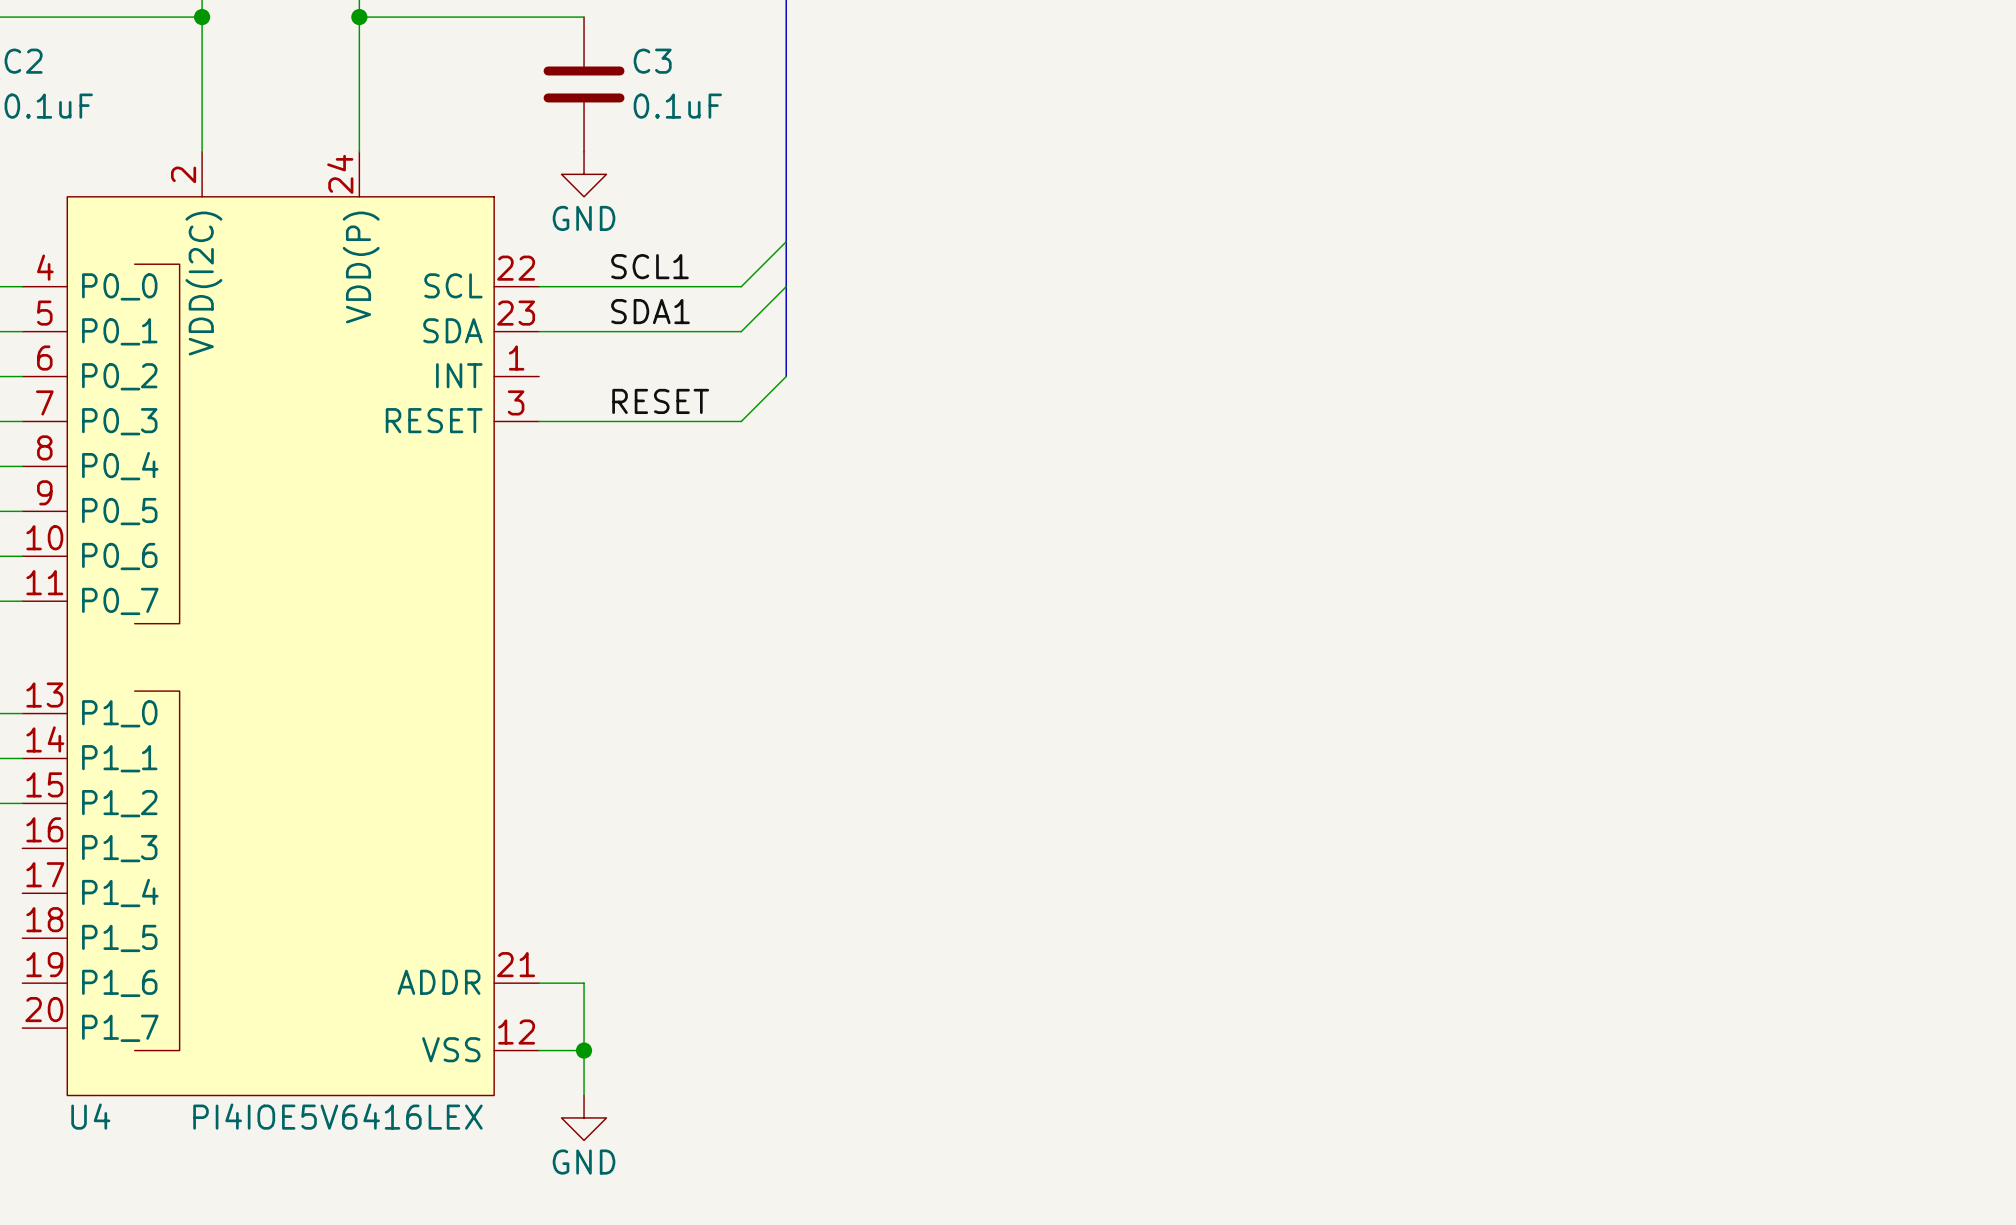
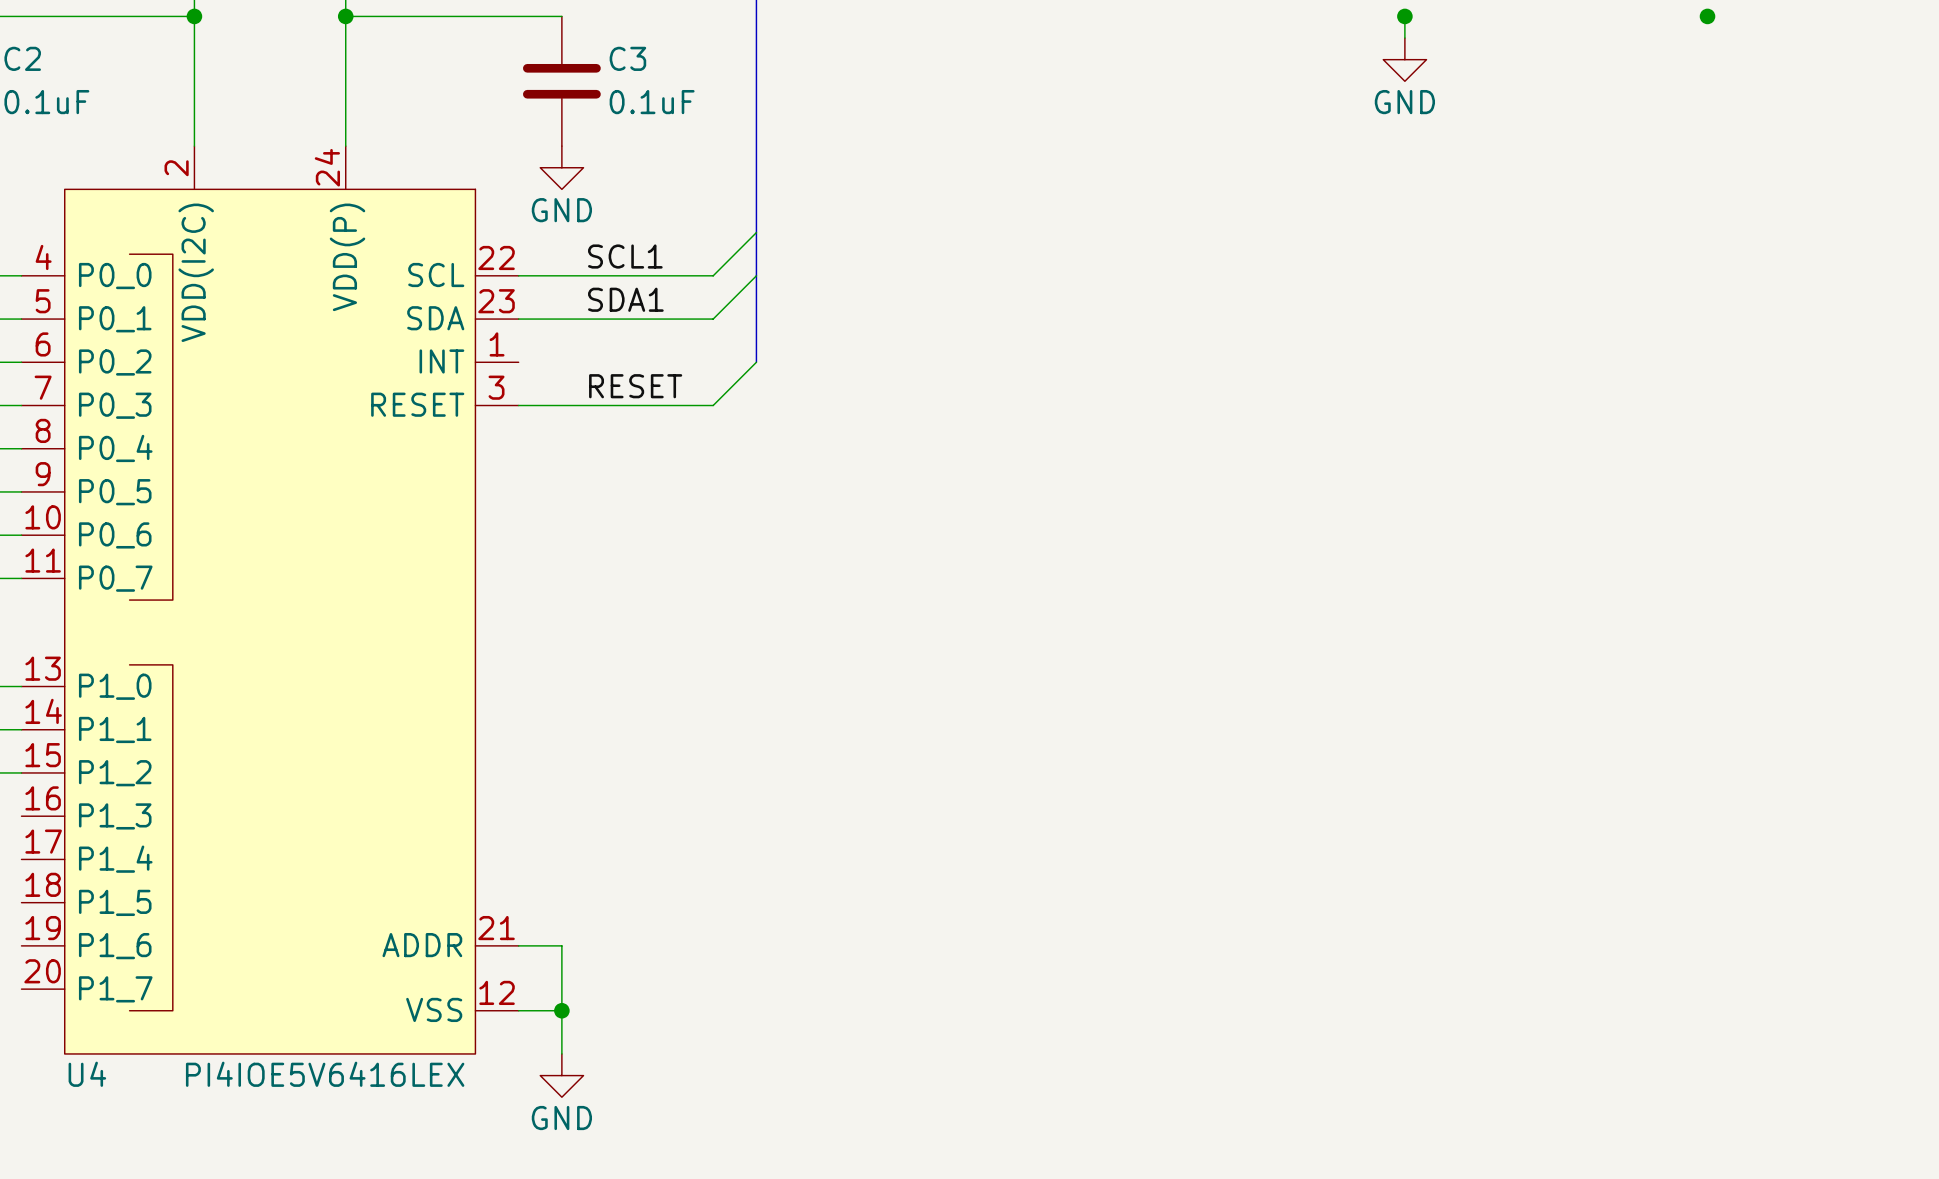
wire: none -> (1404, 16) (1404, 38)
junction: none -> (1404, 16)
junction: none -> (1707, 16)
power symbol: none -> GND (1404, 59)

